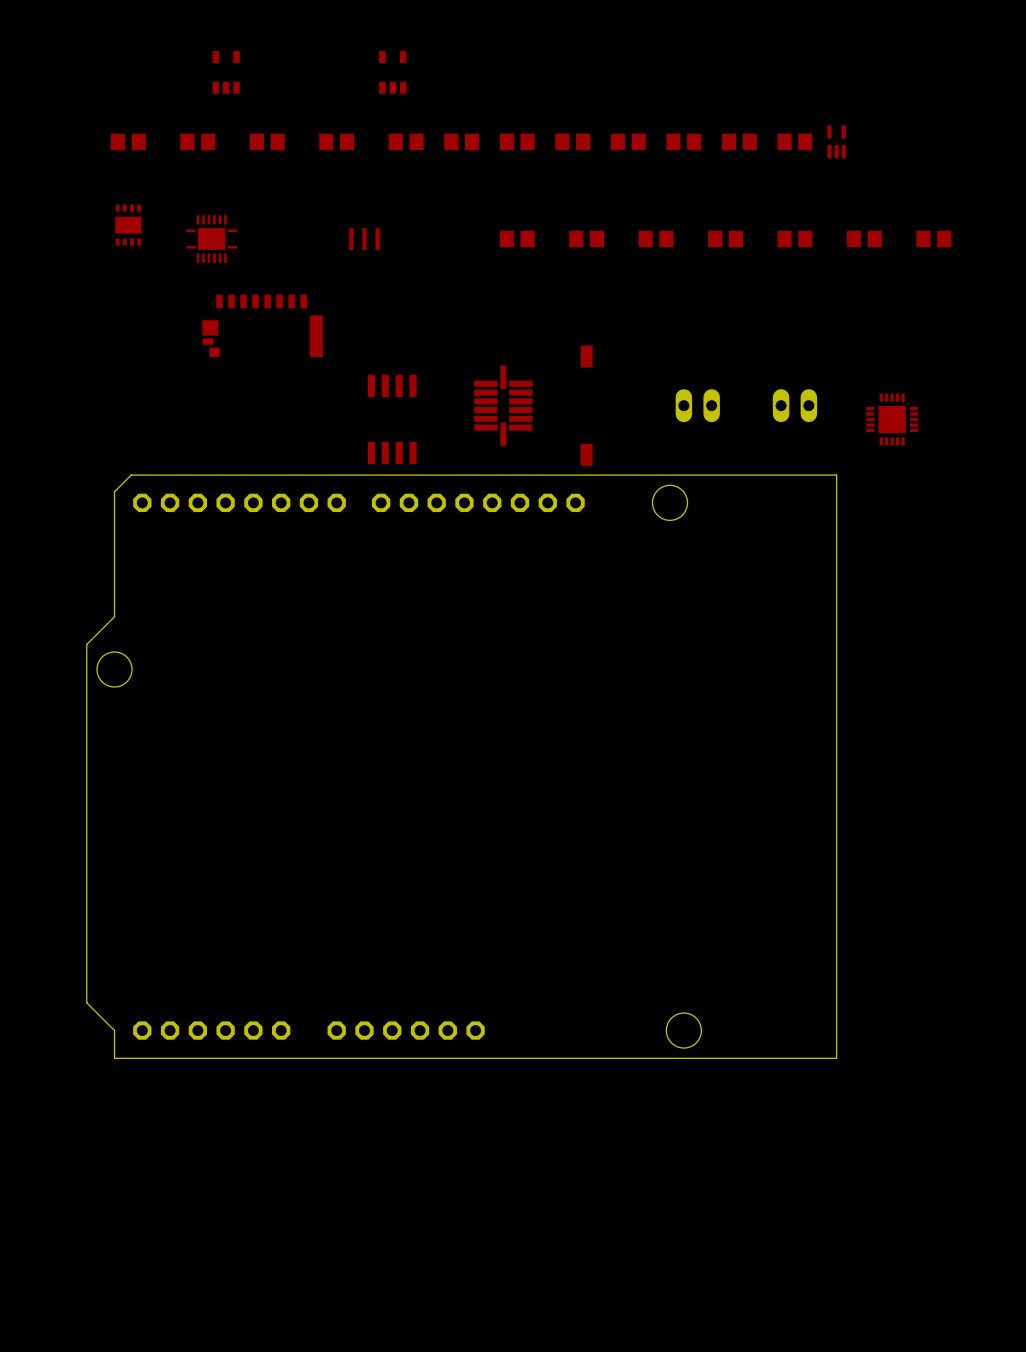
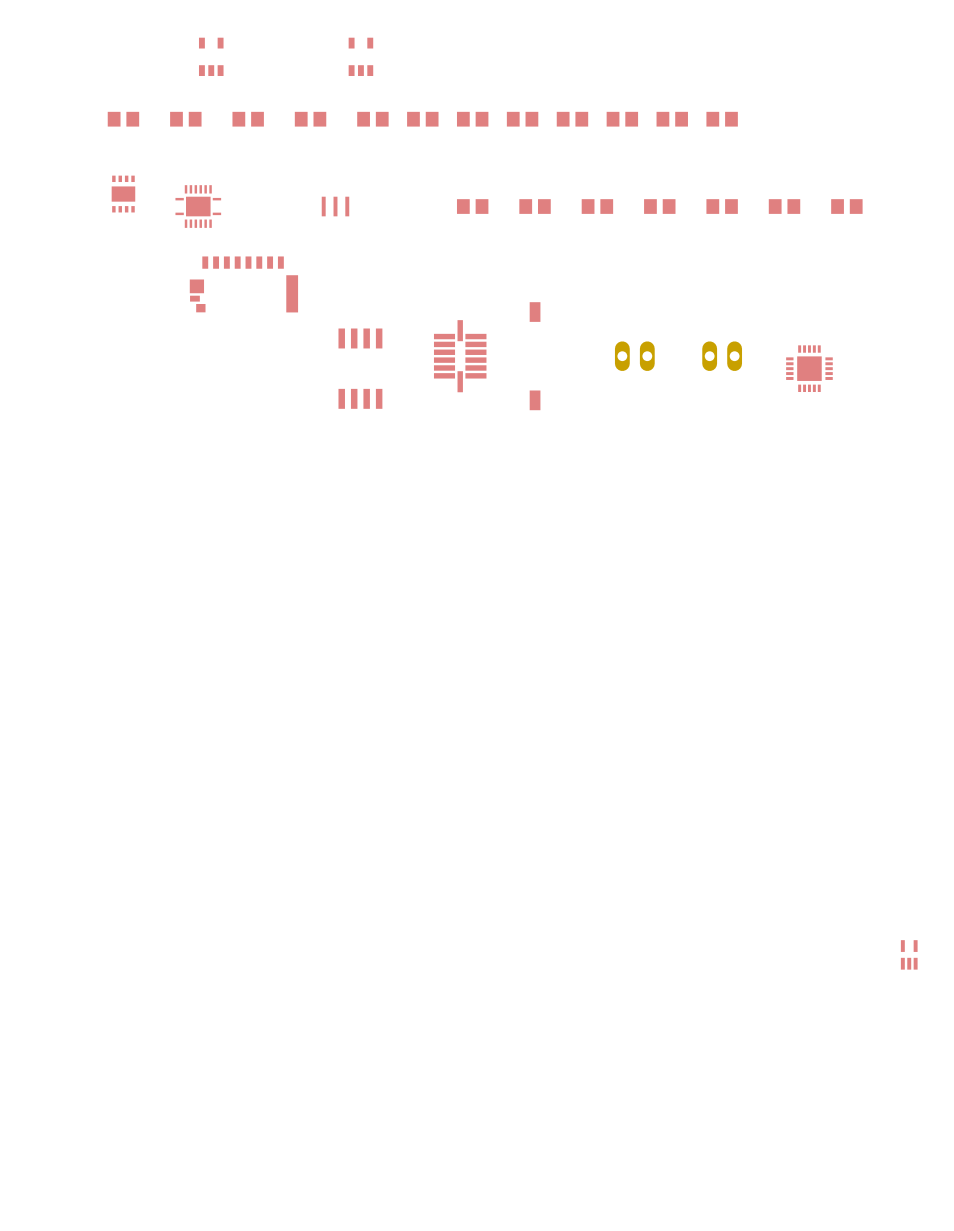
part: (836, 141) -> none
part: (461, 766) -> none
part: none -> (909, 954)

